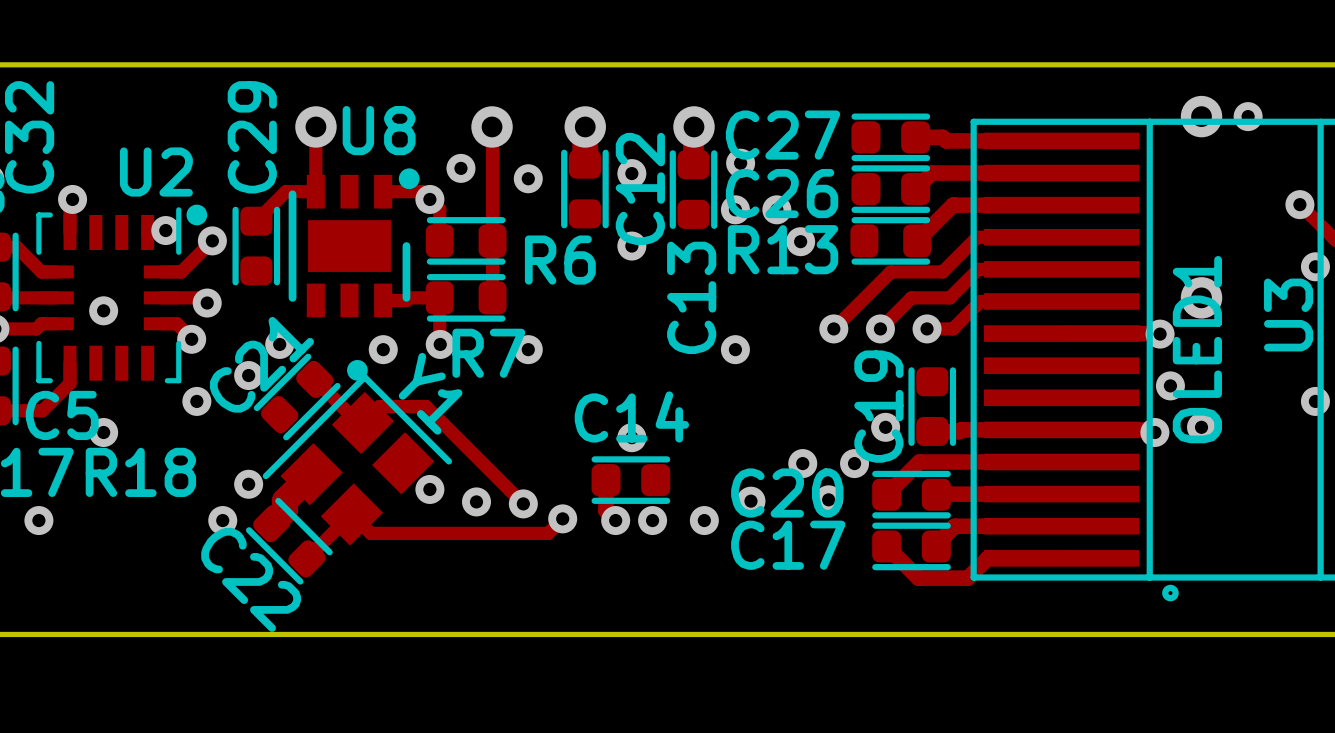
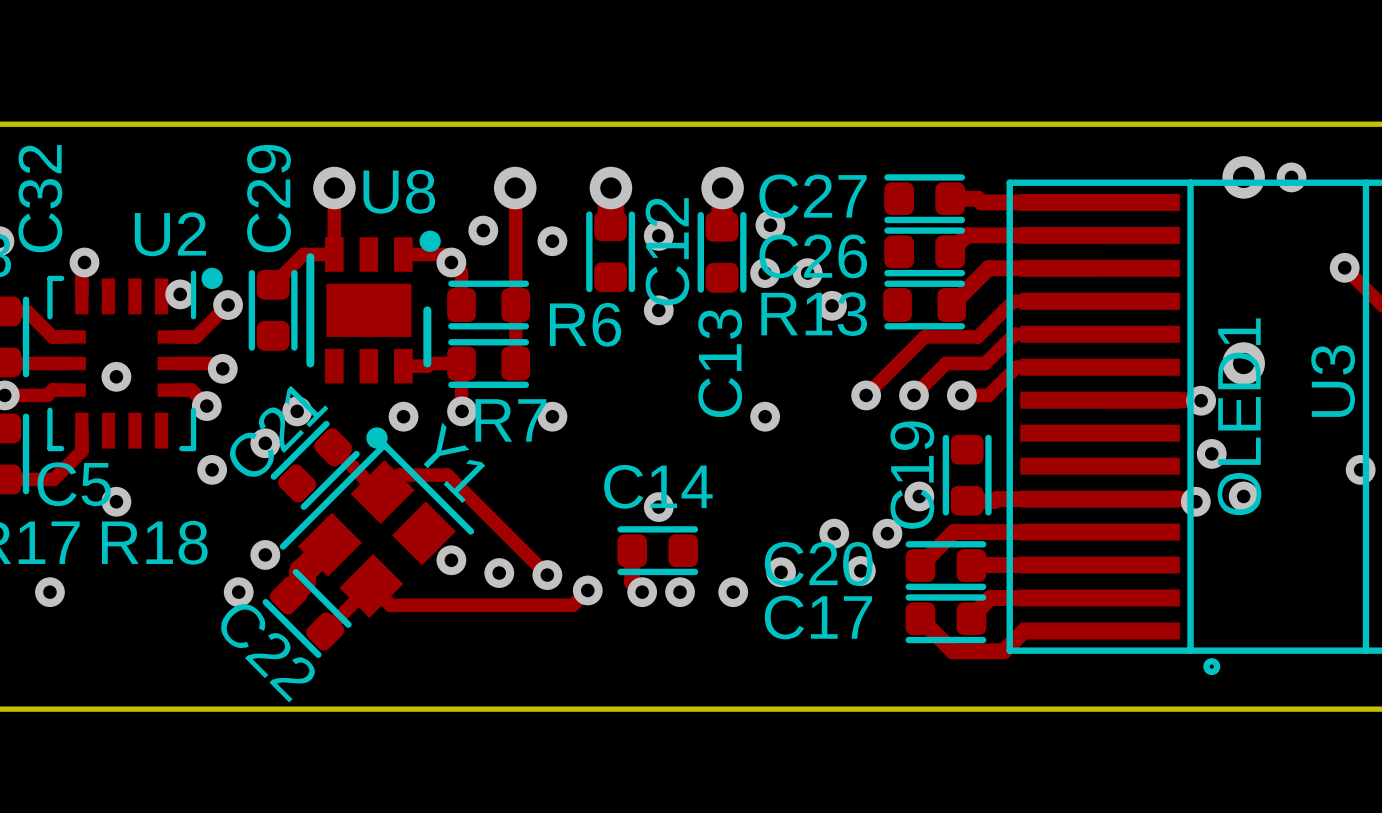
via: (1315, 266) -> none

